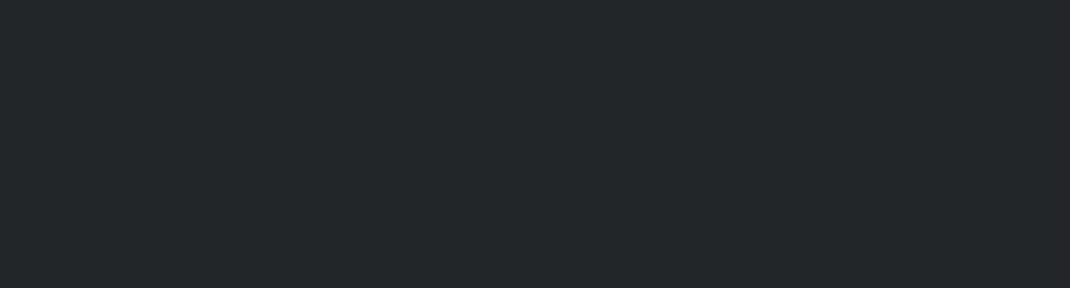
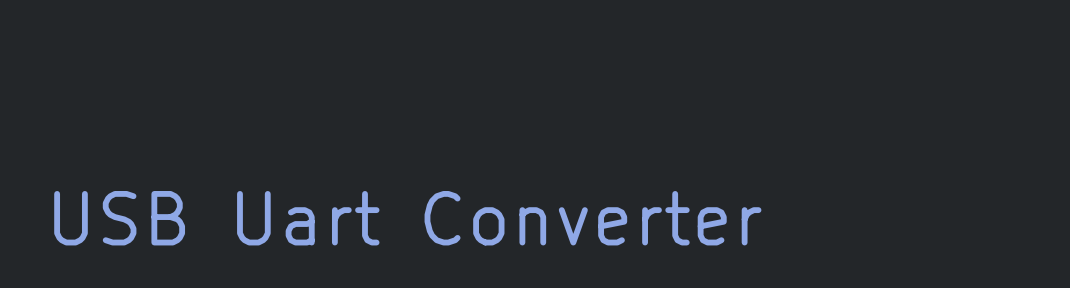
text: none -> USB Uart Converter (407, 218)

